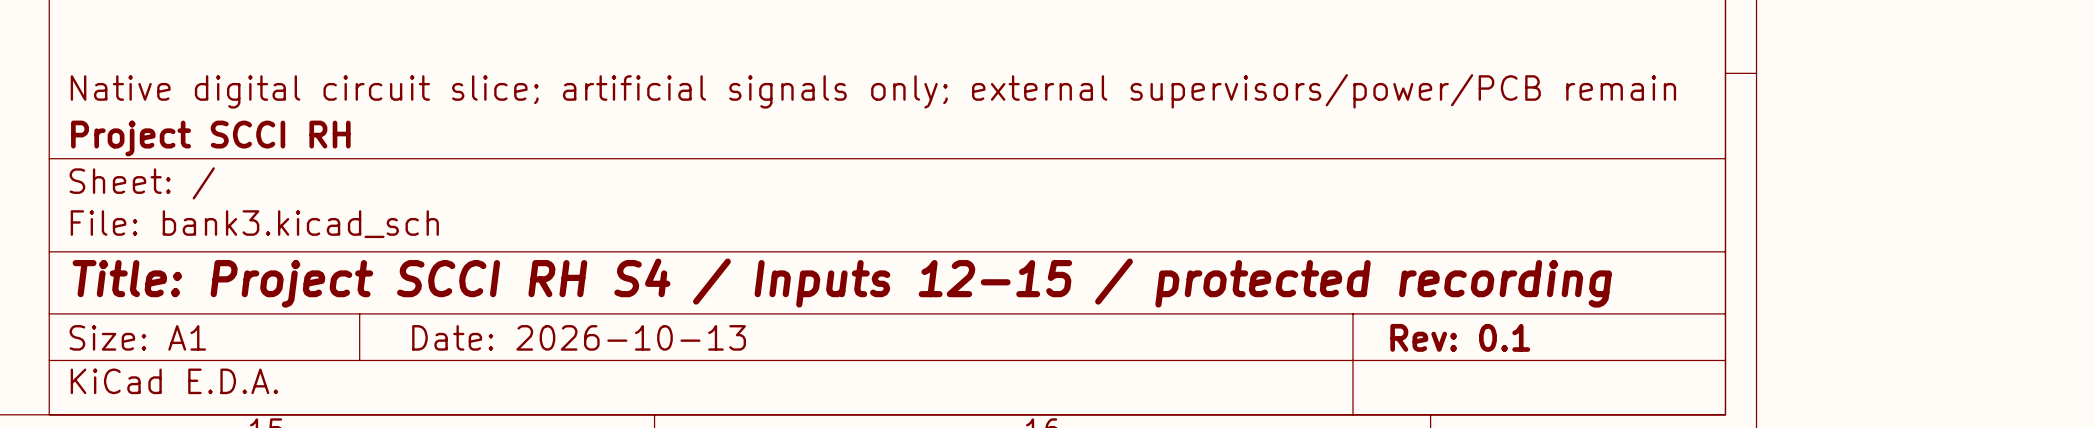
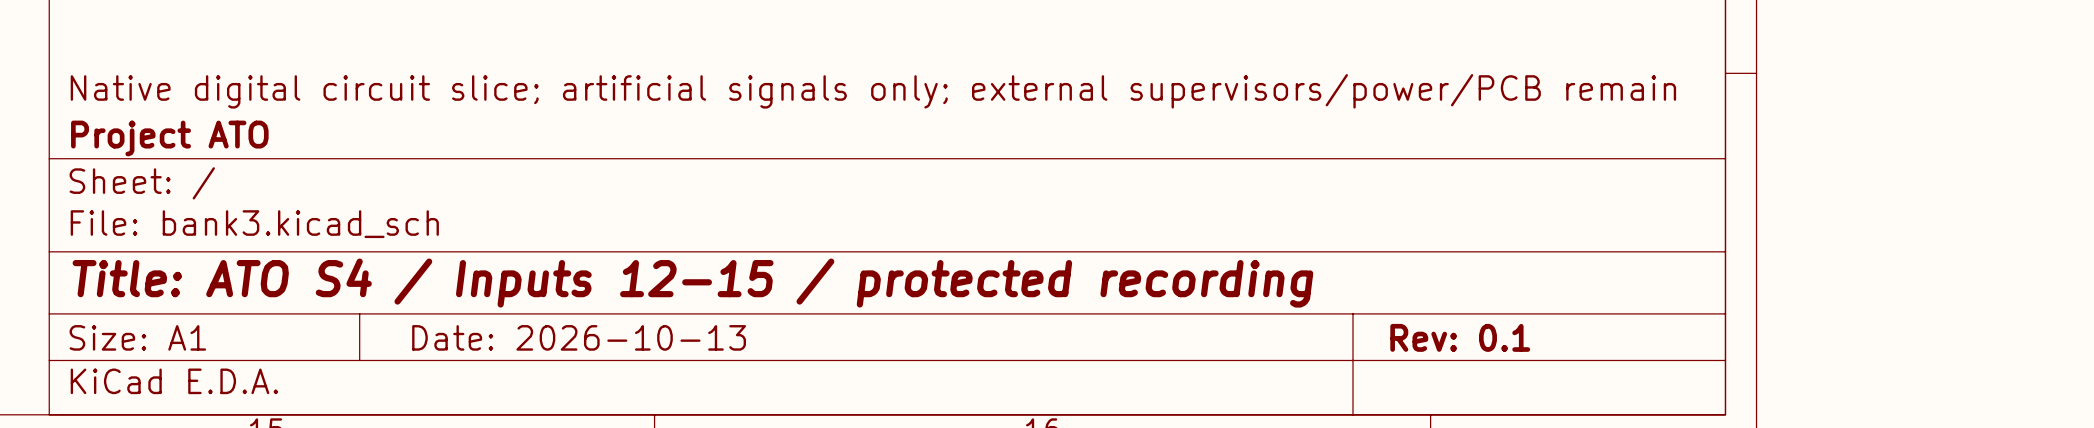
title block: Project SCCI RH (210, 138) -> Project ATO (169, 138)
title block: Title: Project SCCI RH S4 / Inputs 12-15 / protected recording (842, 283) -> Title: ATO S4 / Inputs 12-15 / protected recording (692, 283)

